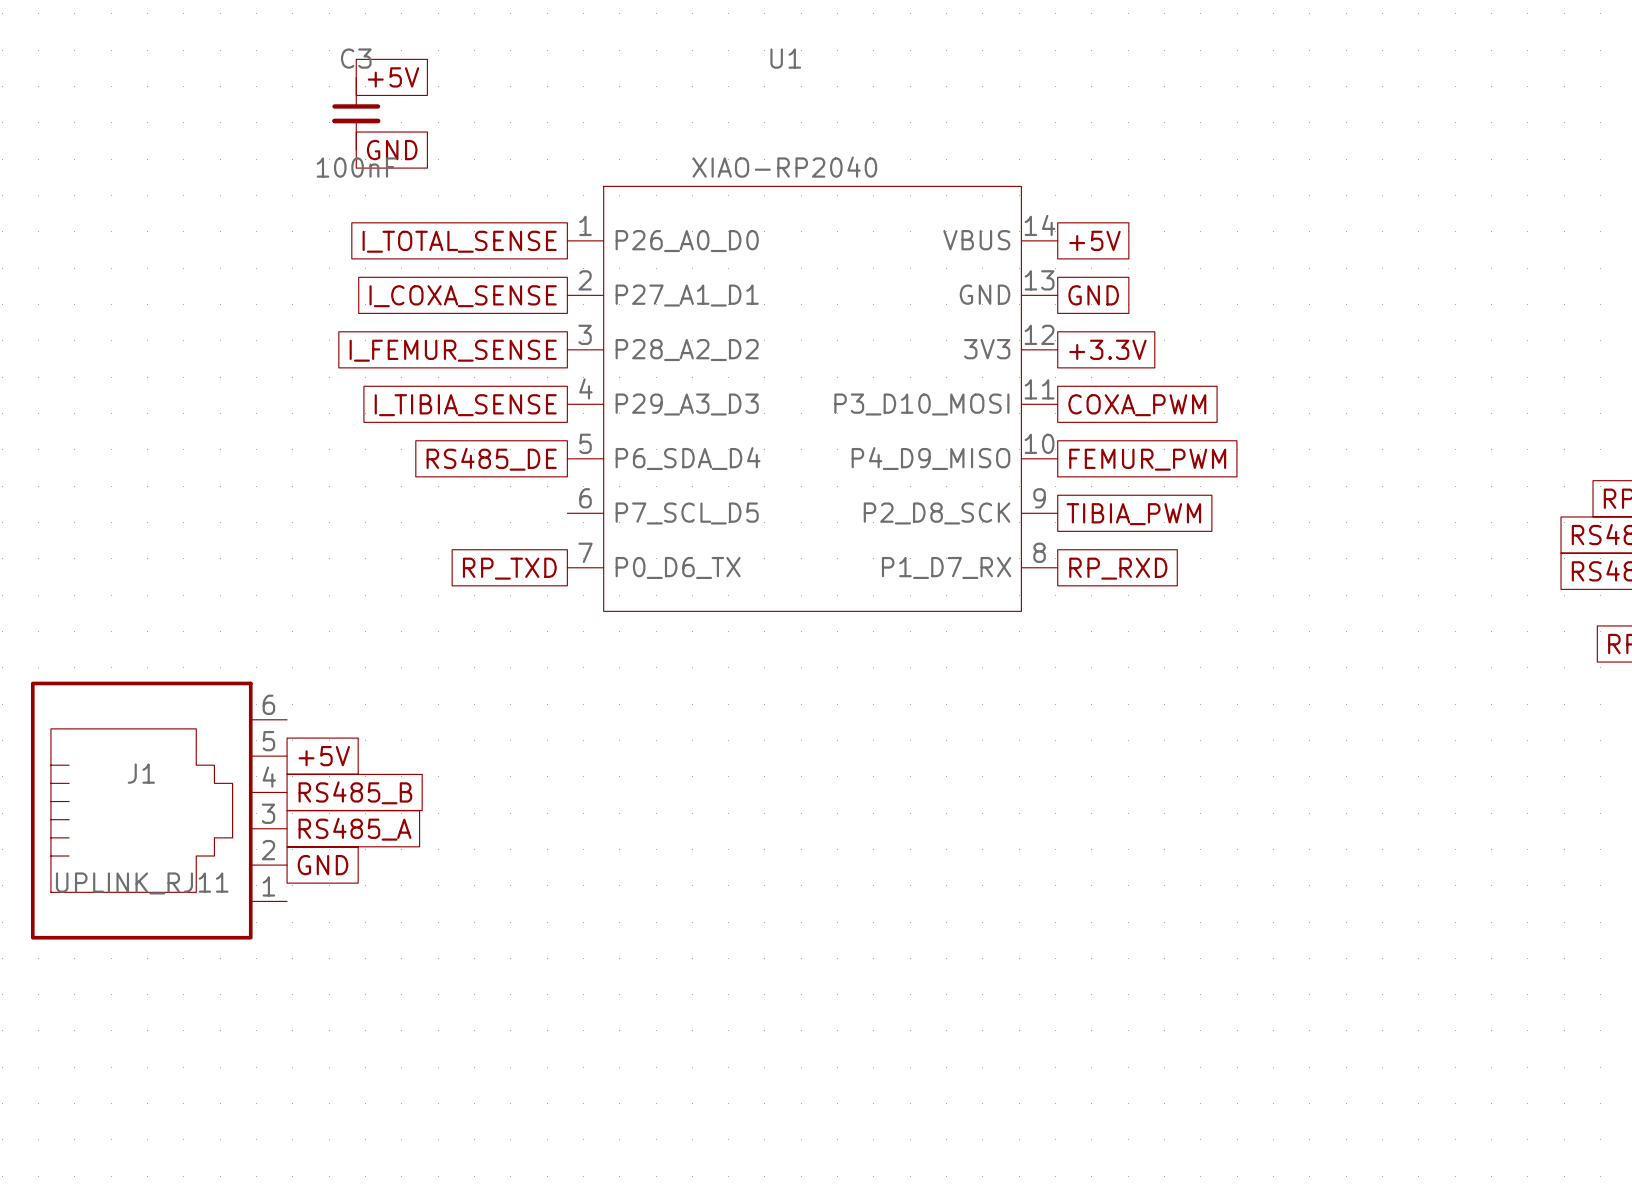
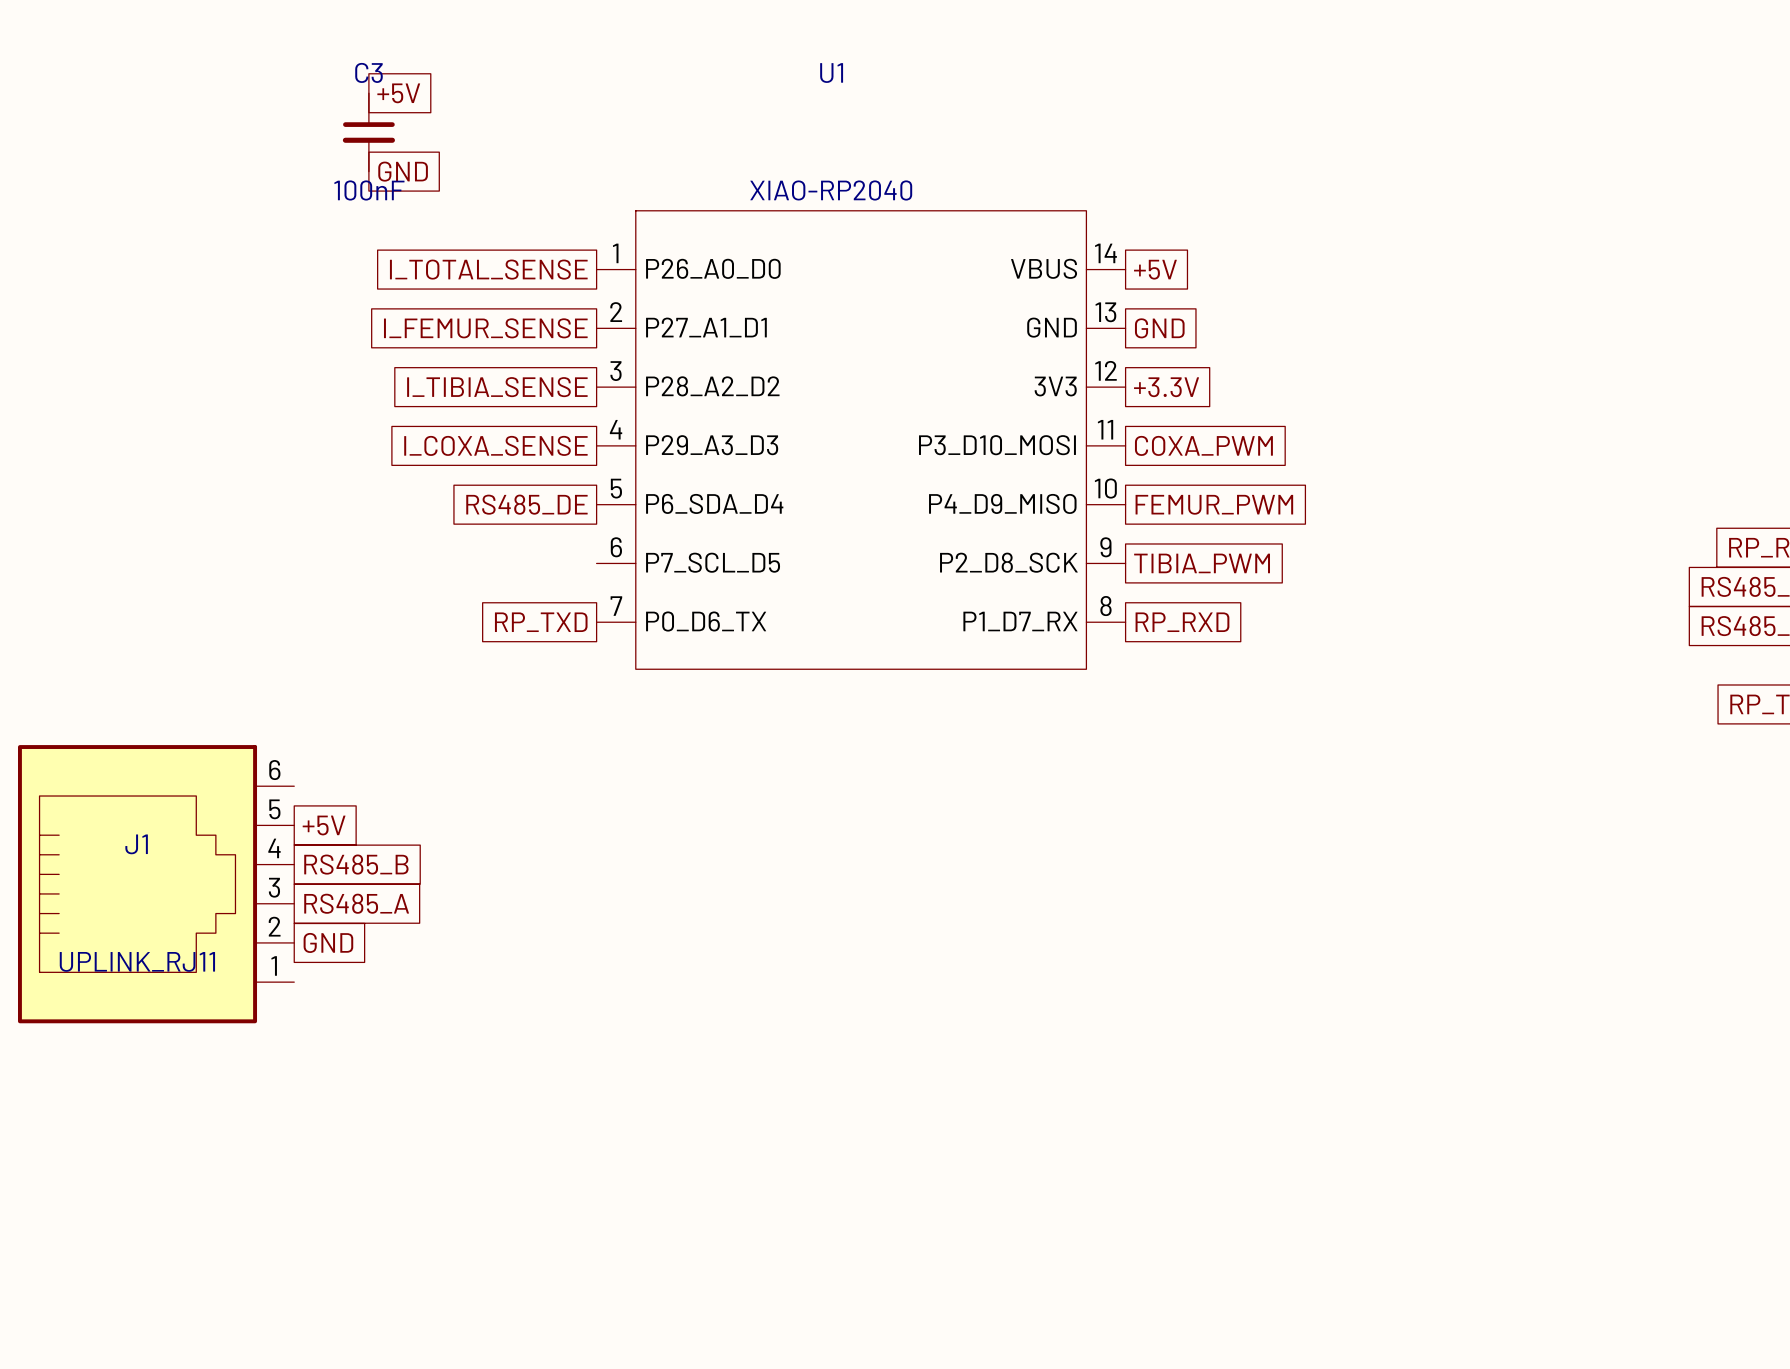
global label: I_COXA_SENSE (463, 296) -> I_FEMUR_SENSE (485, 328)
global label: I_FEMUR_SENSE (453, 350) -> I_TIBIA_SENSE (497, 387)
global label: I_TIBIA_SENSE (465, 405) -> I_COXA_SENSE (495, 445)

